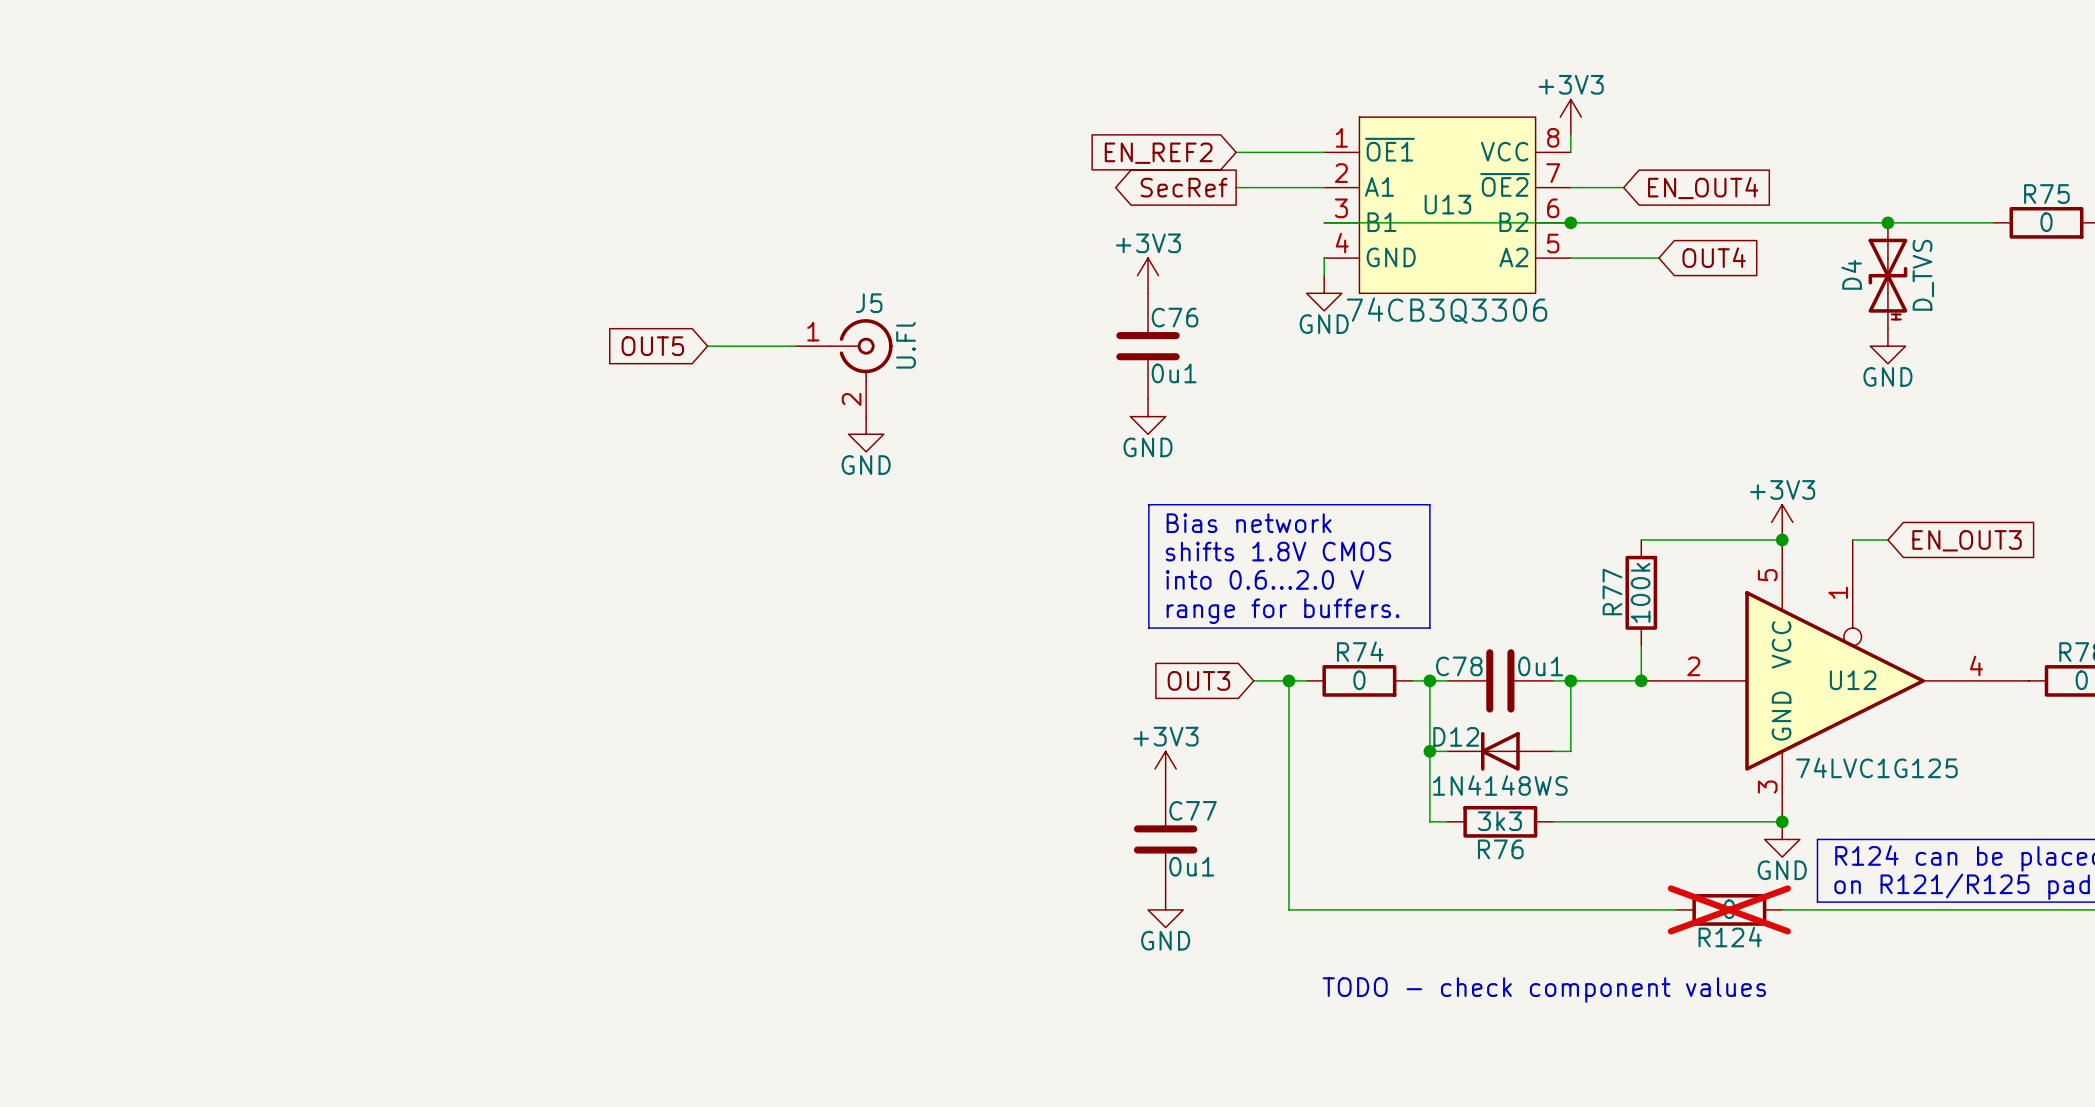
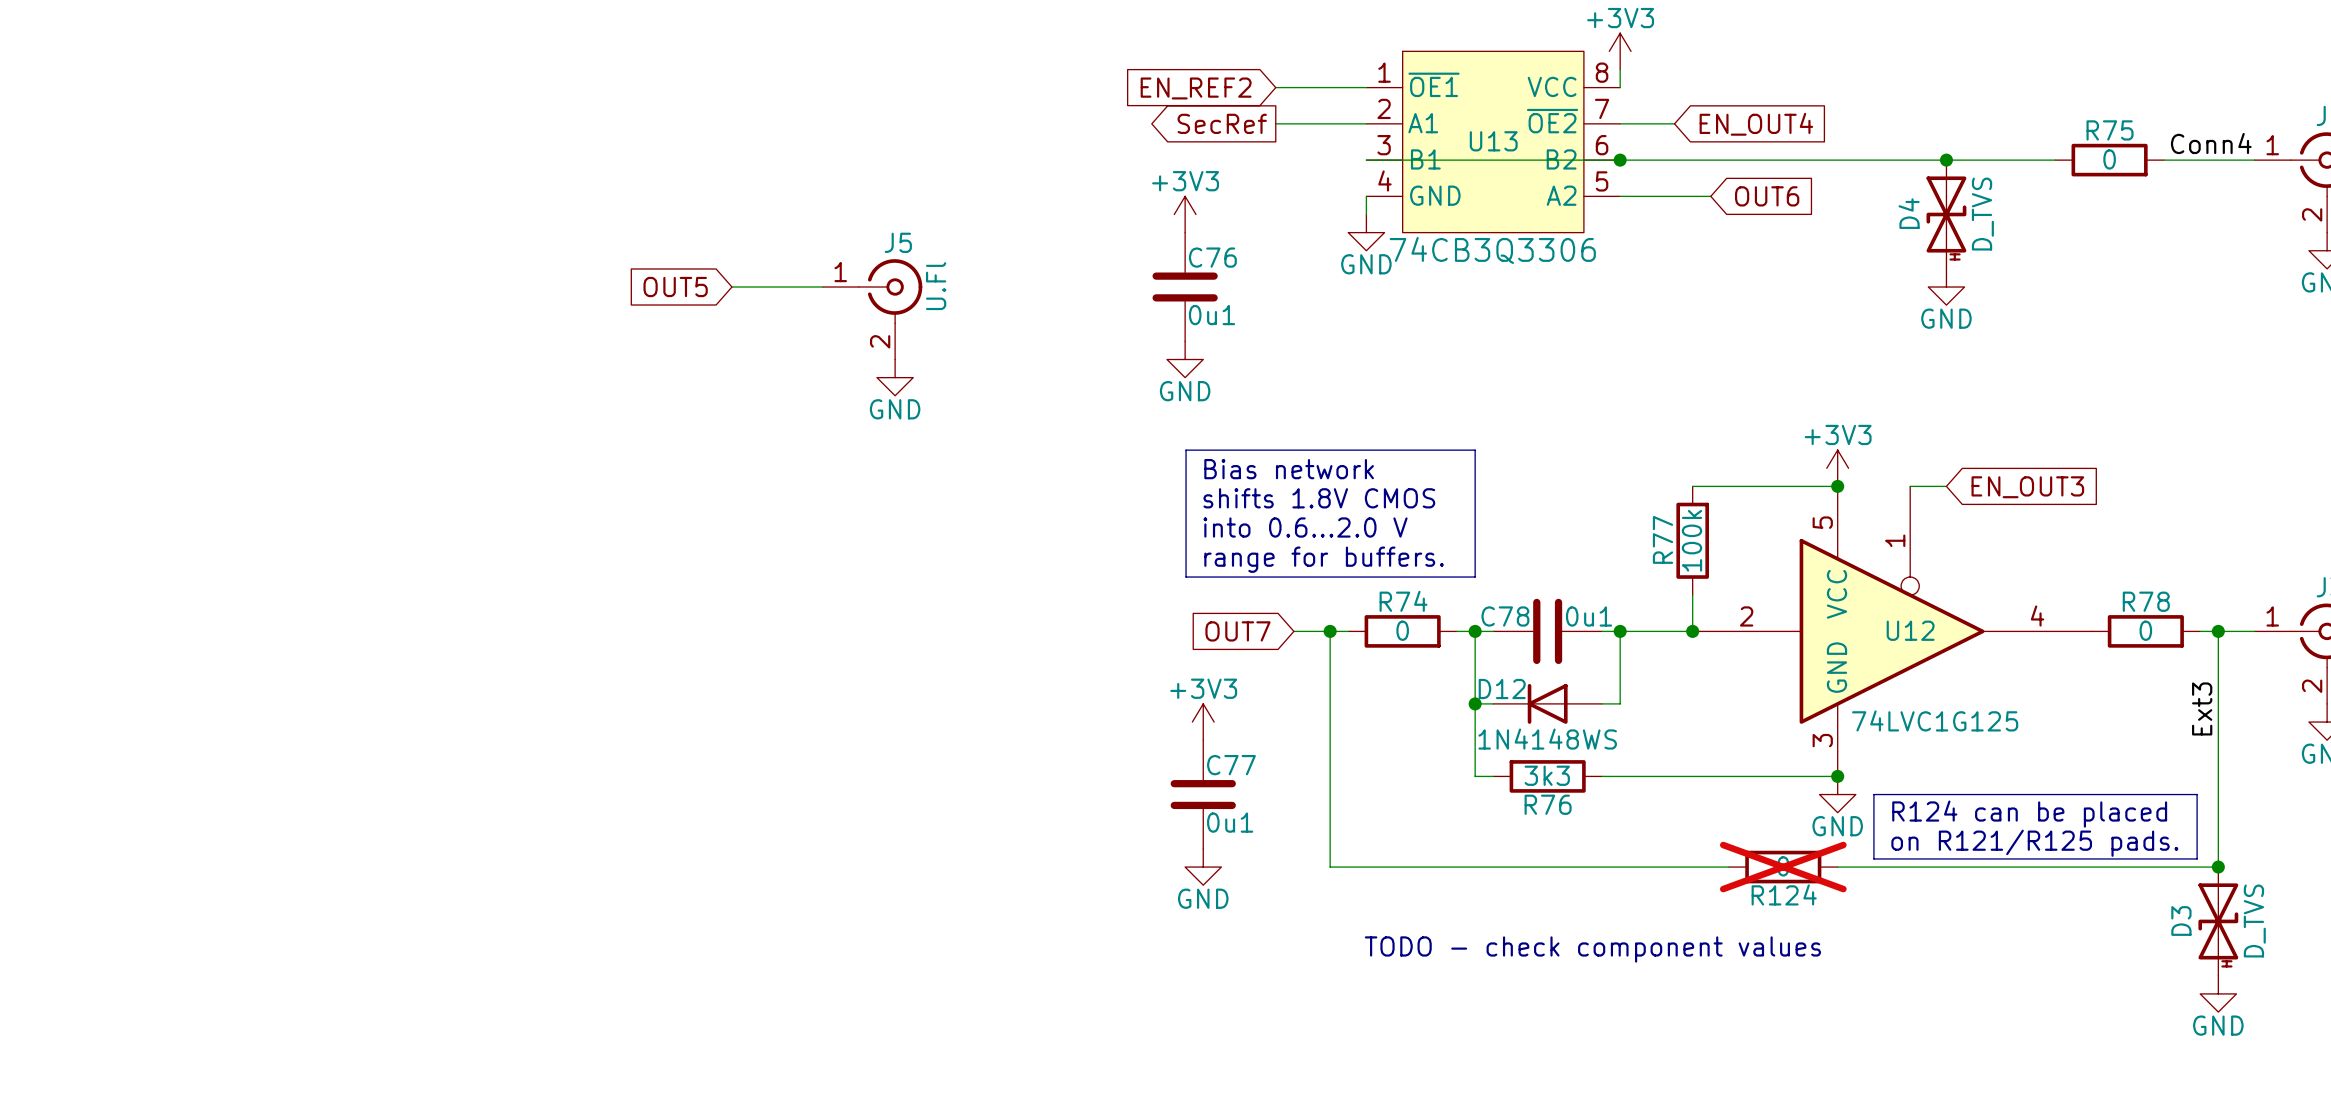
global label: OUT4 (1714, 257) -> OUT6 (1767, 196)
global label: OUT3 (1198, 680) -> OUT7 (1237, 631)

